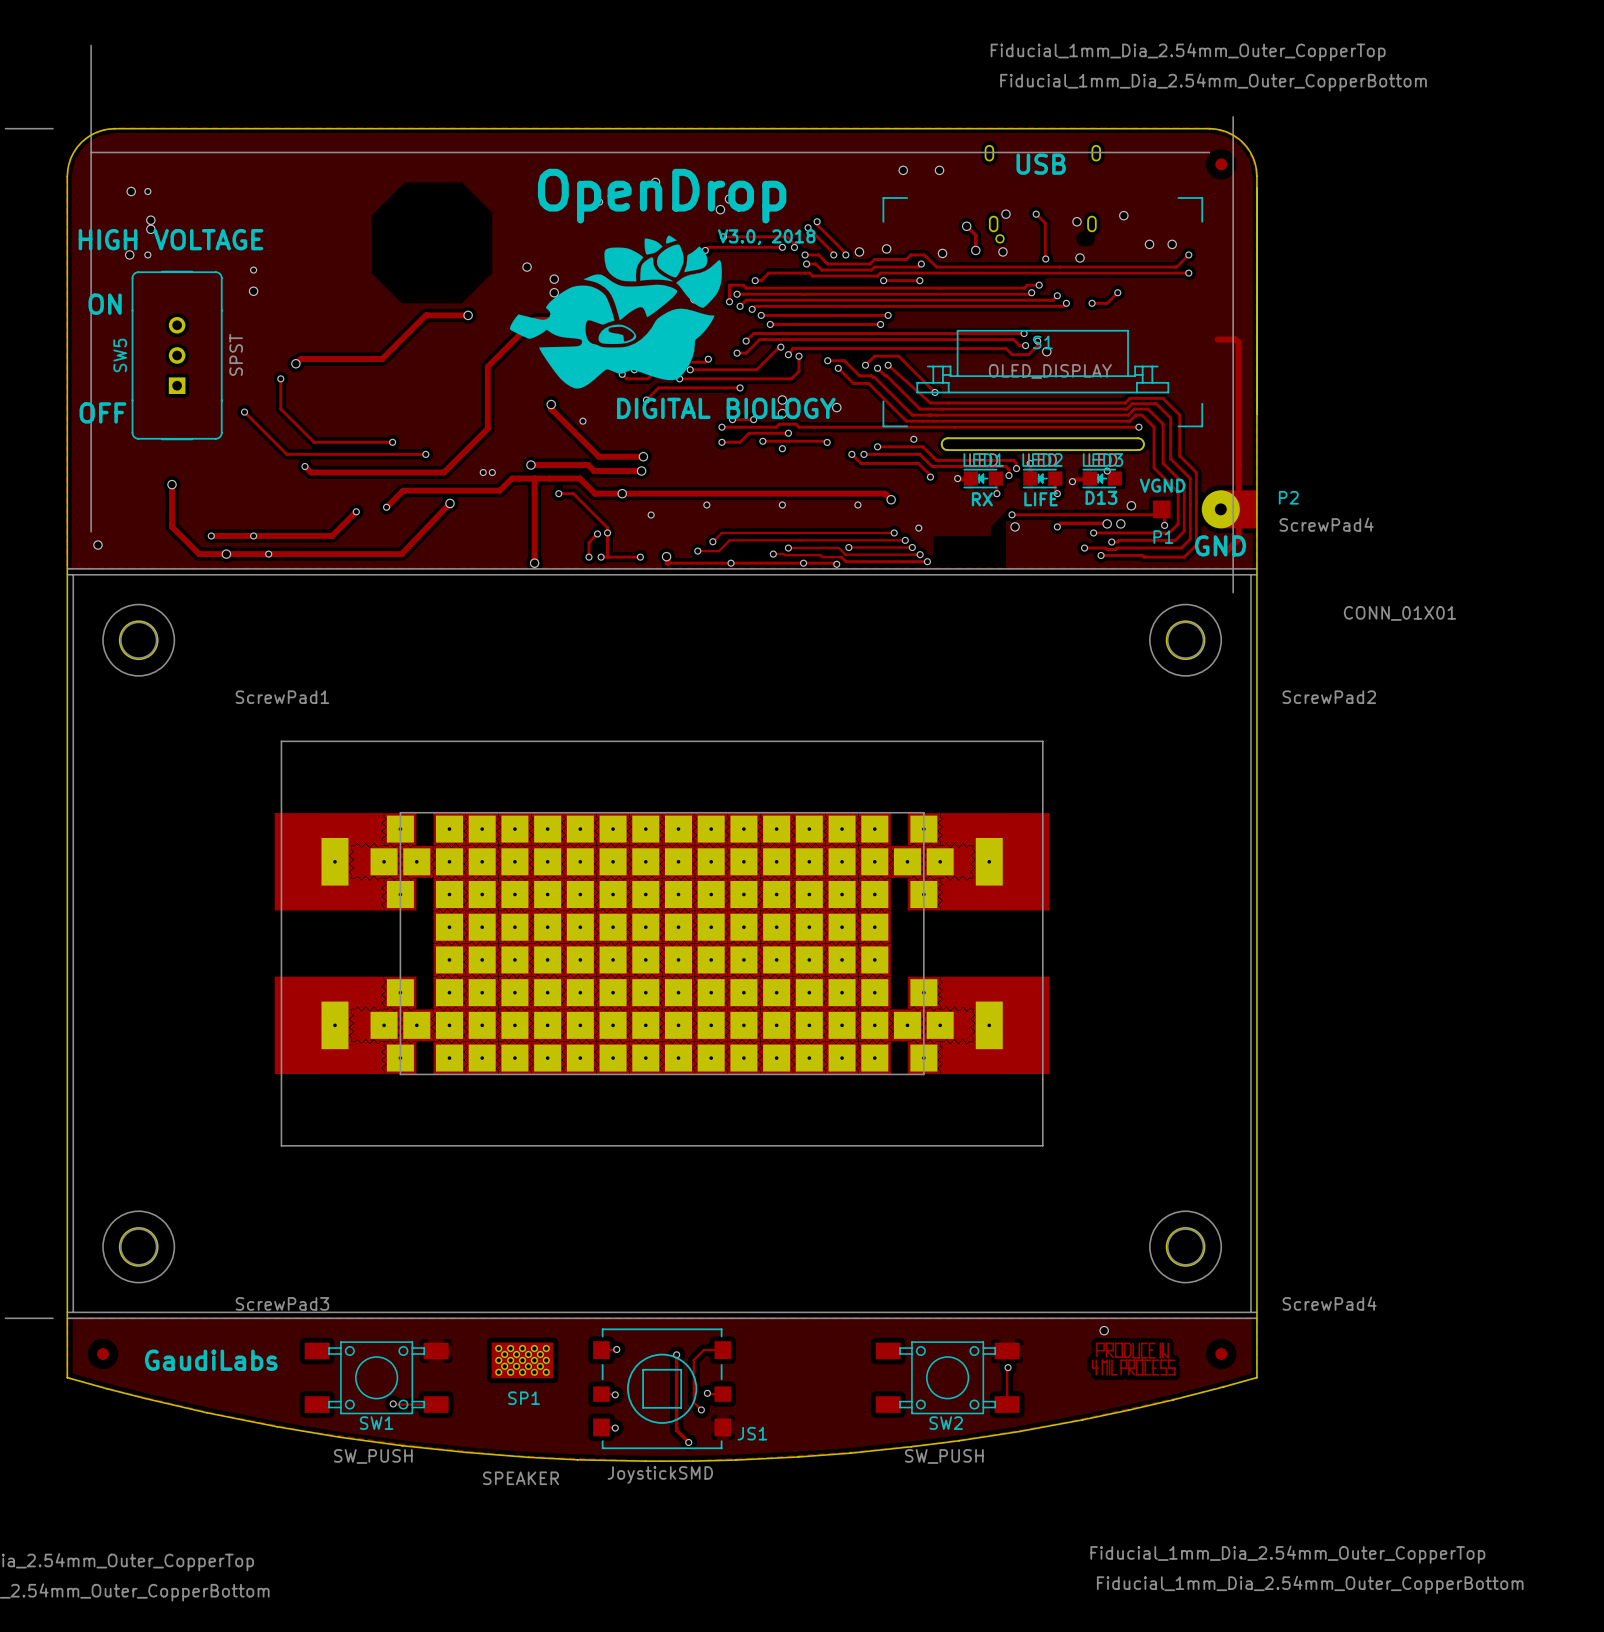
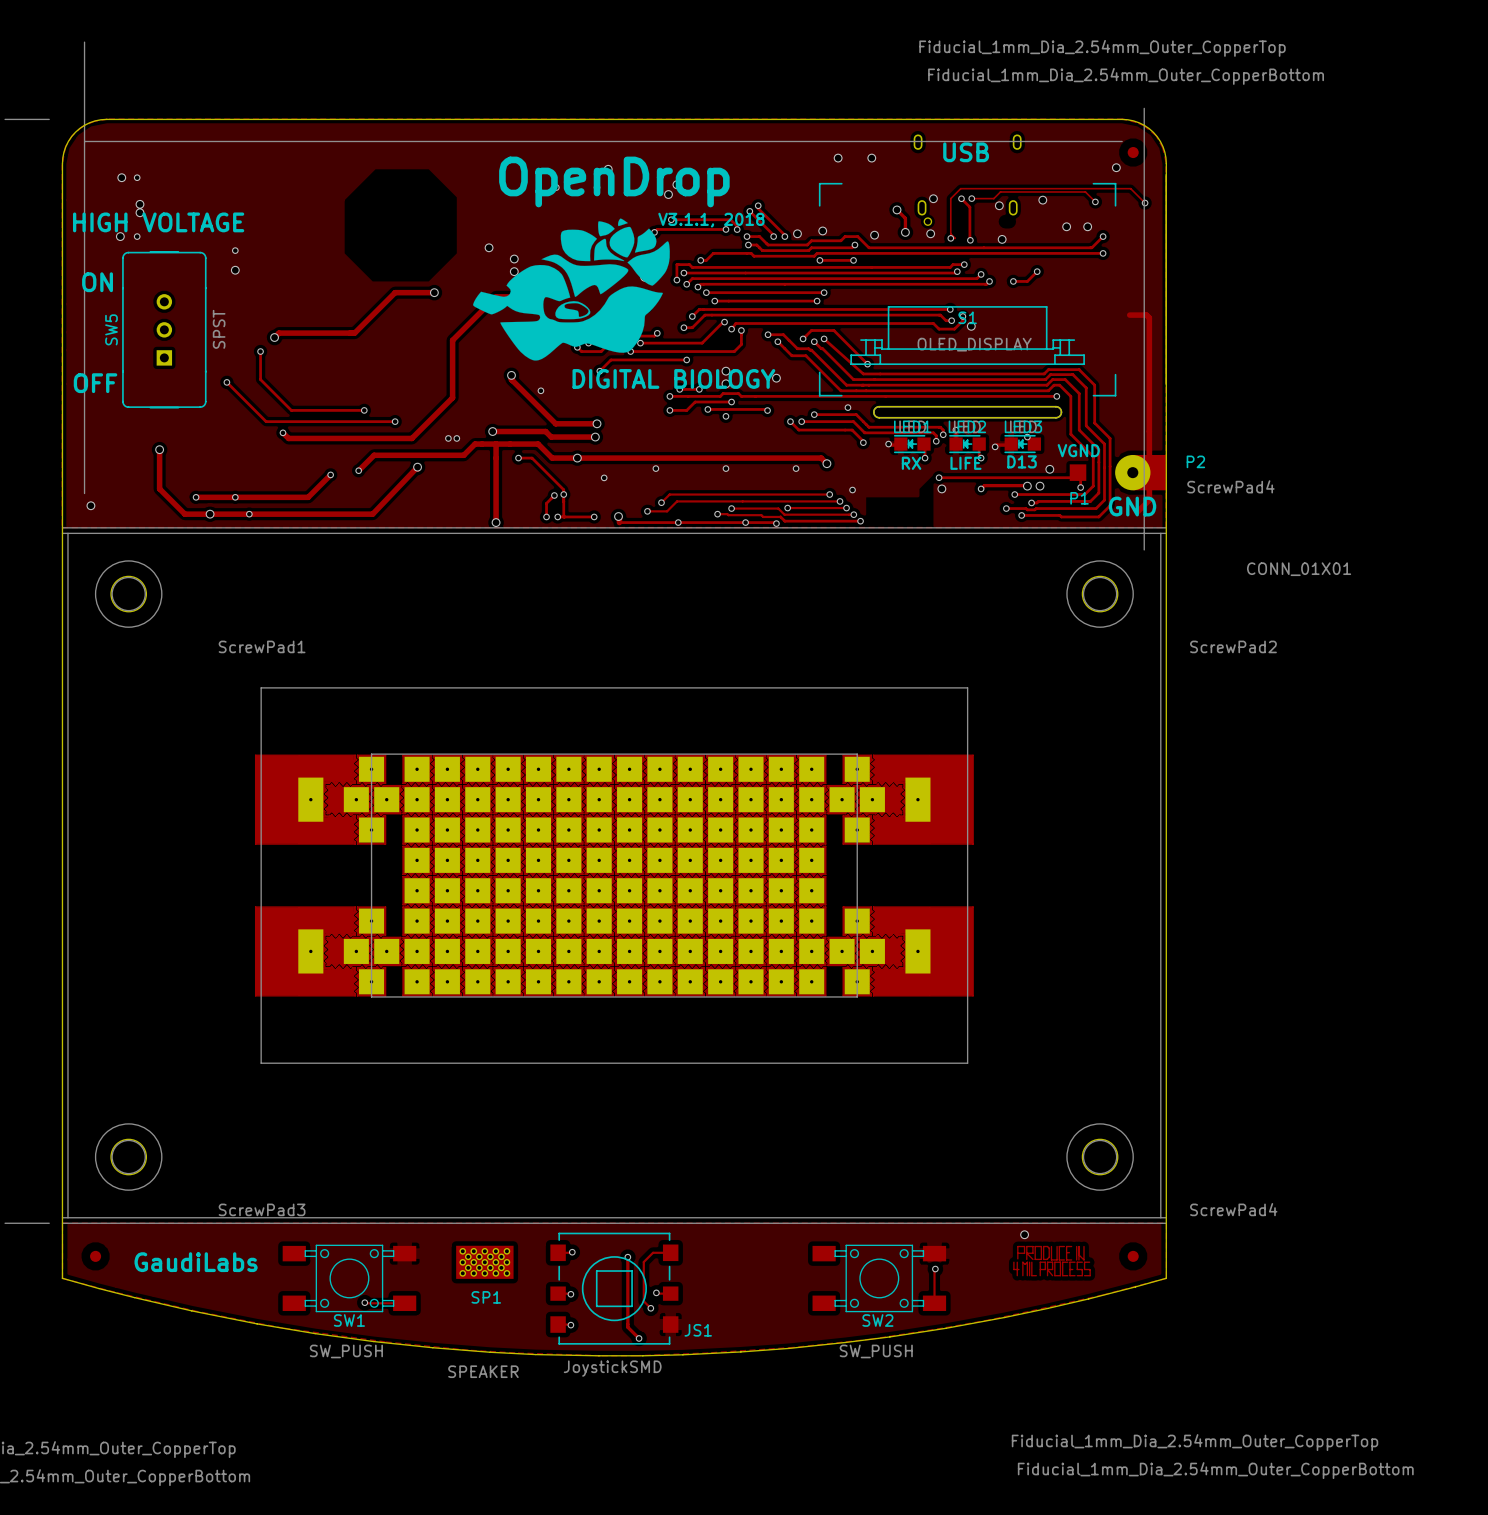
via: none -> (1116, 167)
track: none -> (971, 198) (993, 198) (1000, 191) (1085, 191) (1095, 201)
via: none -> (971, 198)
via: none -> (1095, 201)
track: none -> (1145, 203) (1130, 188) (960, 188) (950, 198) (950, 233) (955, 238) (950, 238)
via: none -> (1145, 203)
text: V3.0, 2018 (766, 237) -> V3.1.1, 2018 (711, 220)
via: none -> (950, 238)

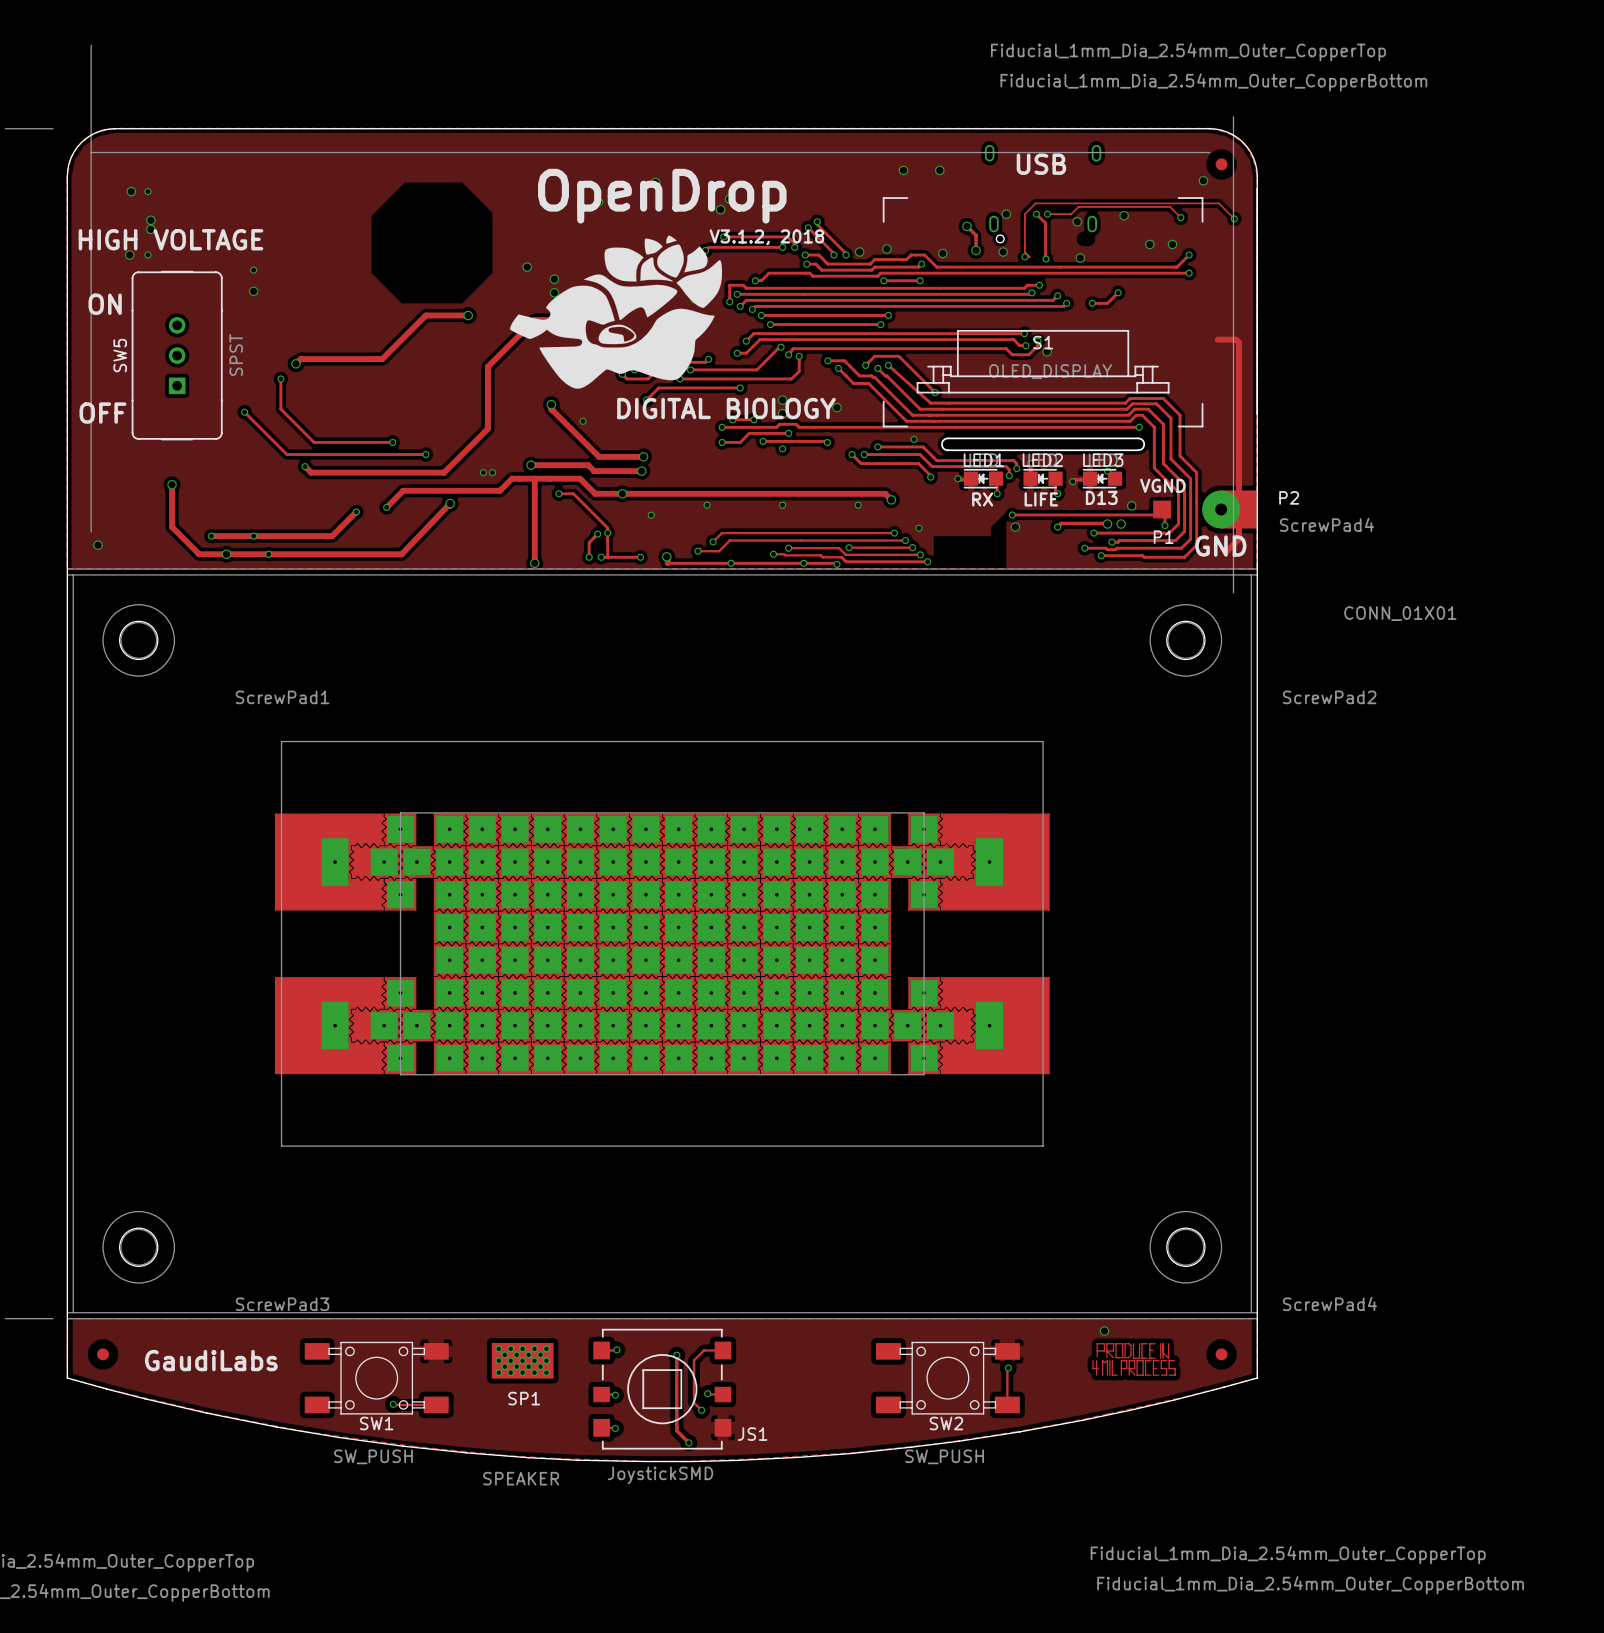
text: V3.1.1, 2018 (711, 220) -> V3.1.2, 2018 (766, 237)

